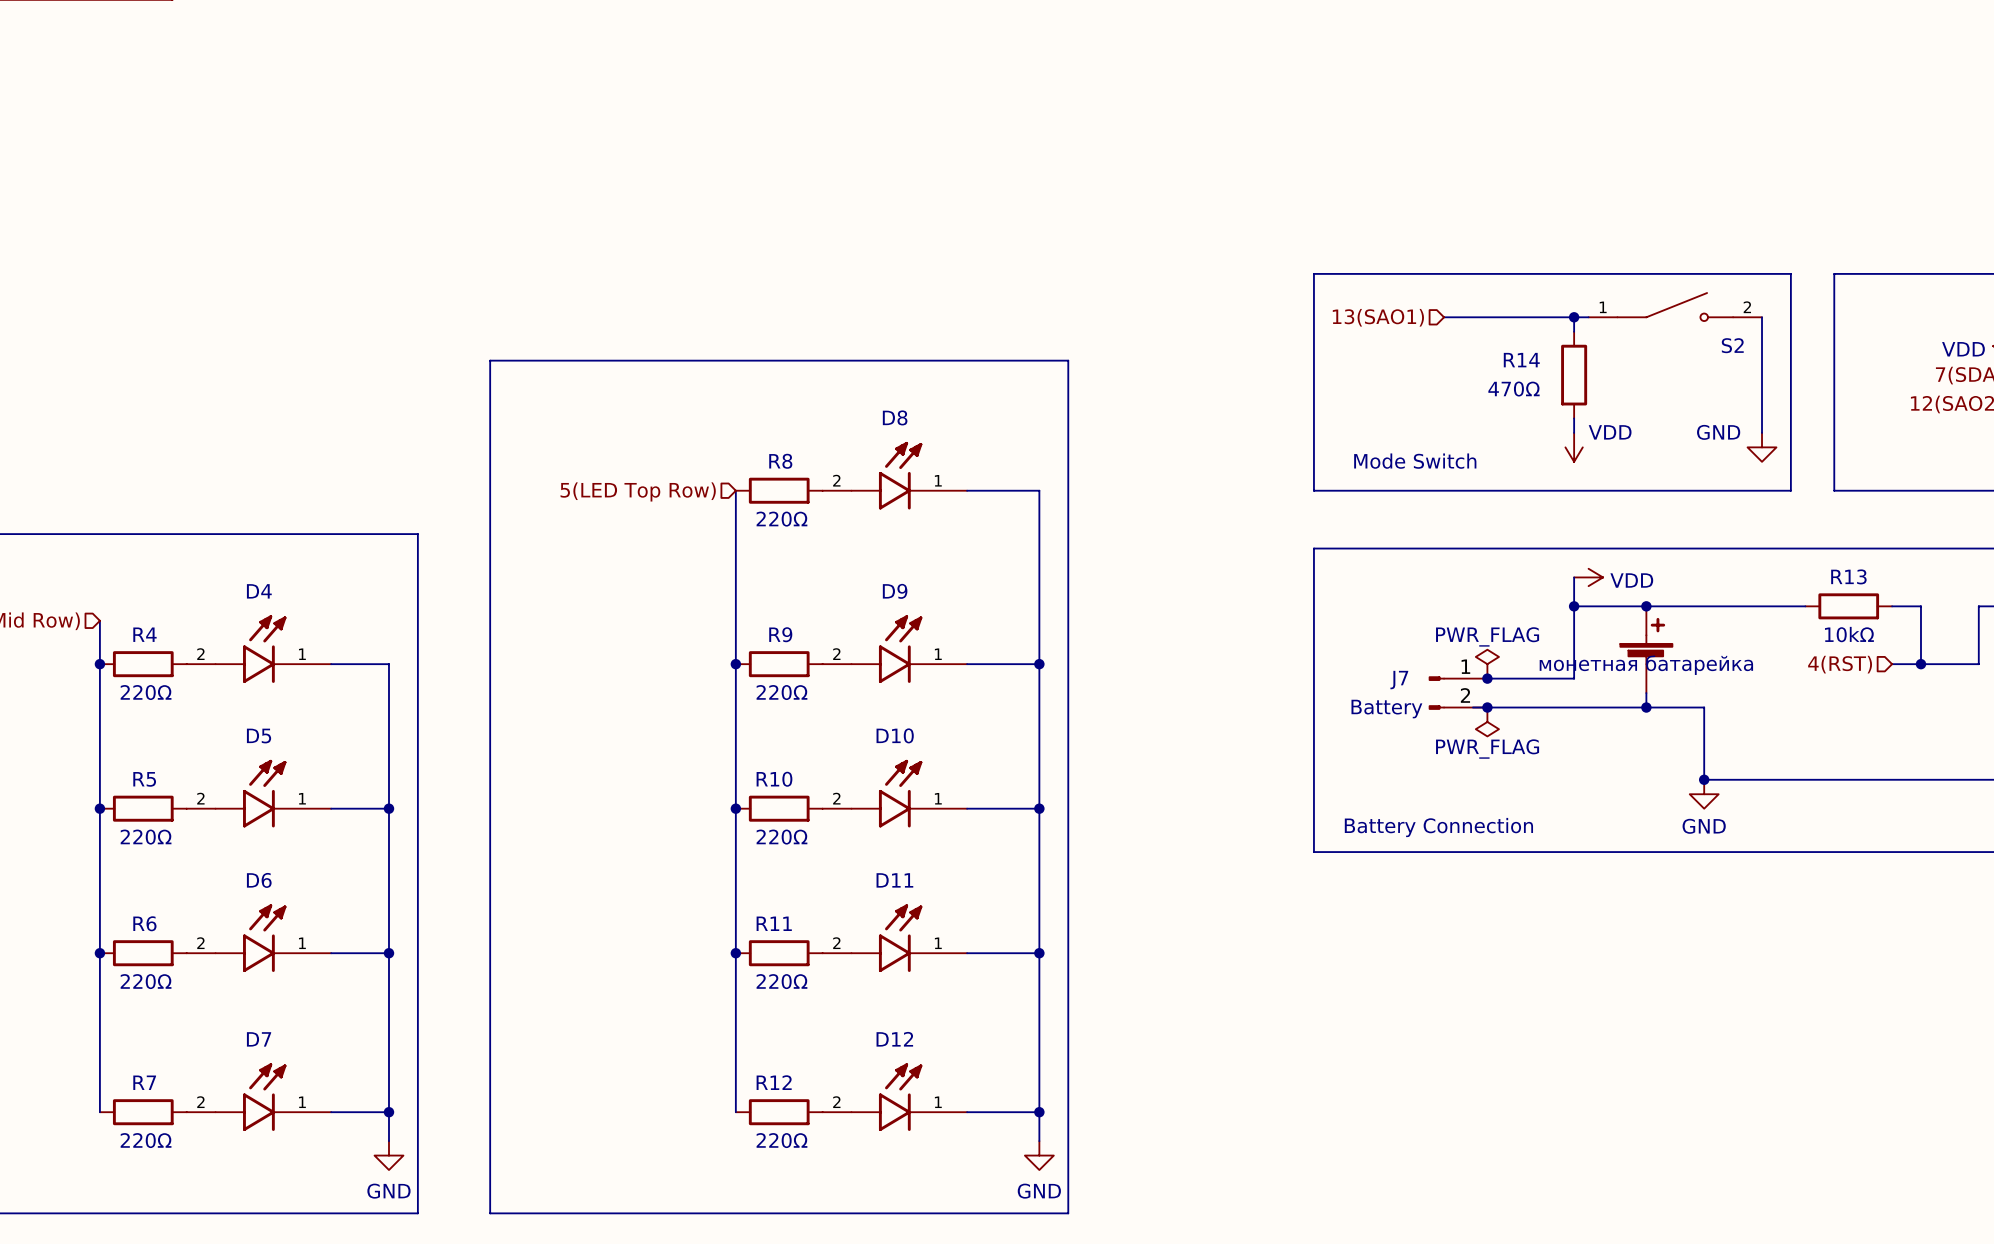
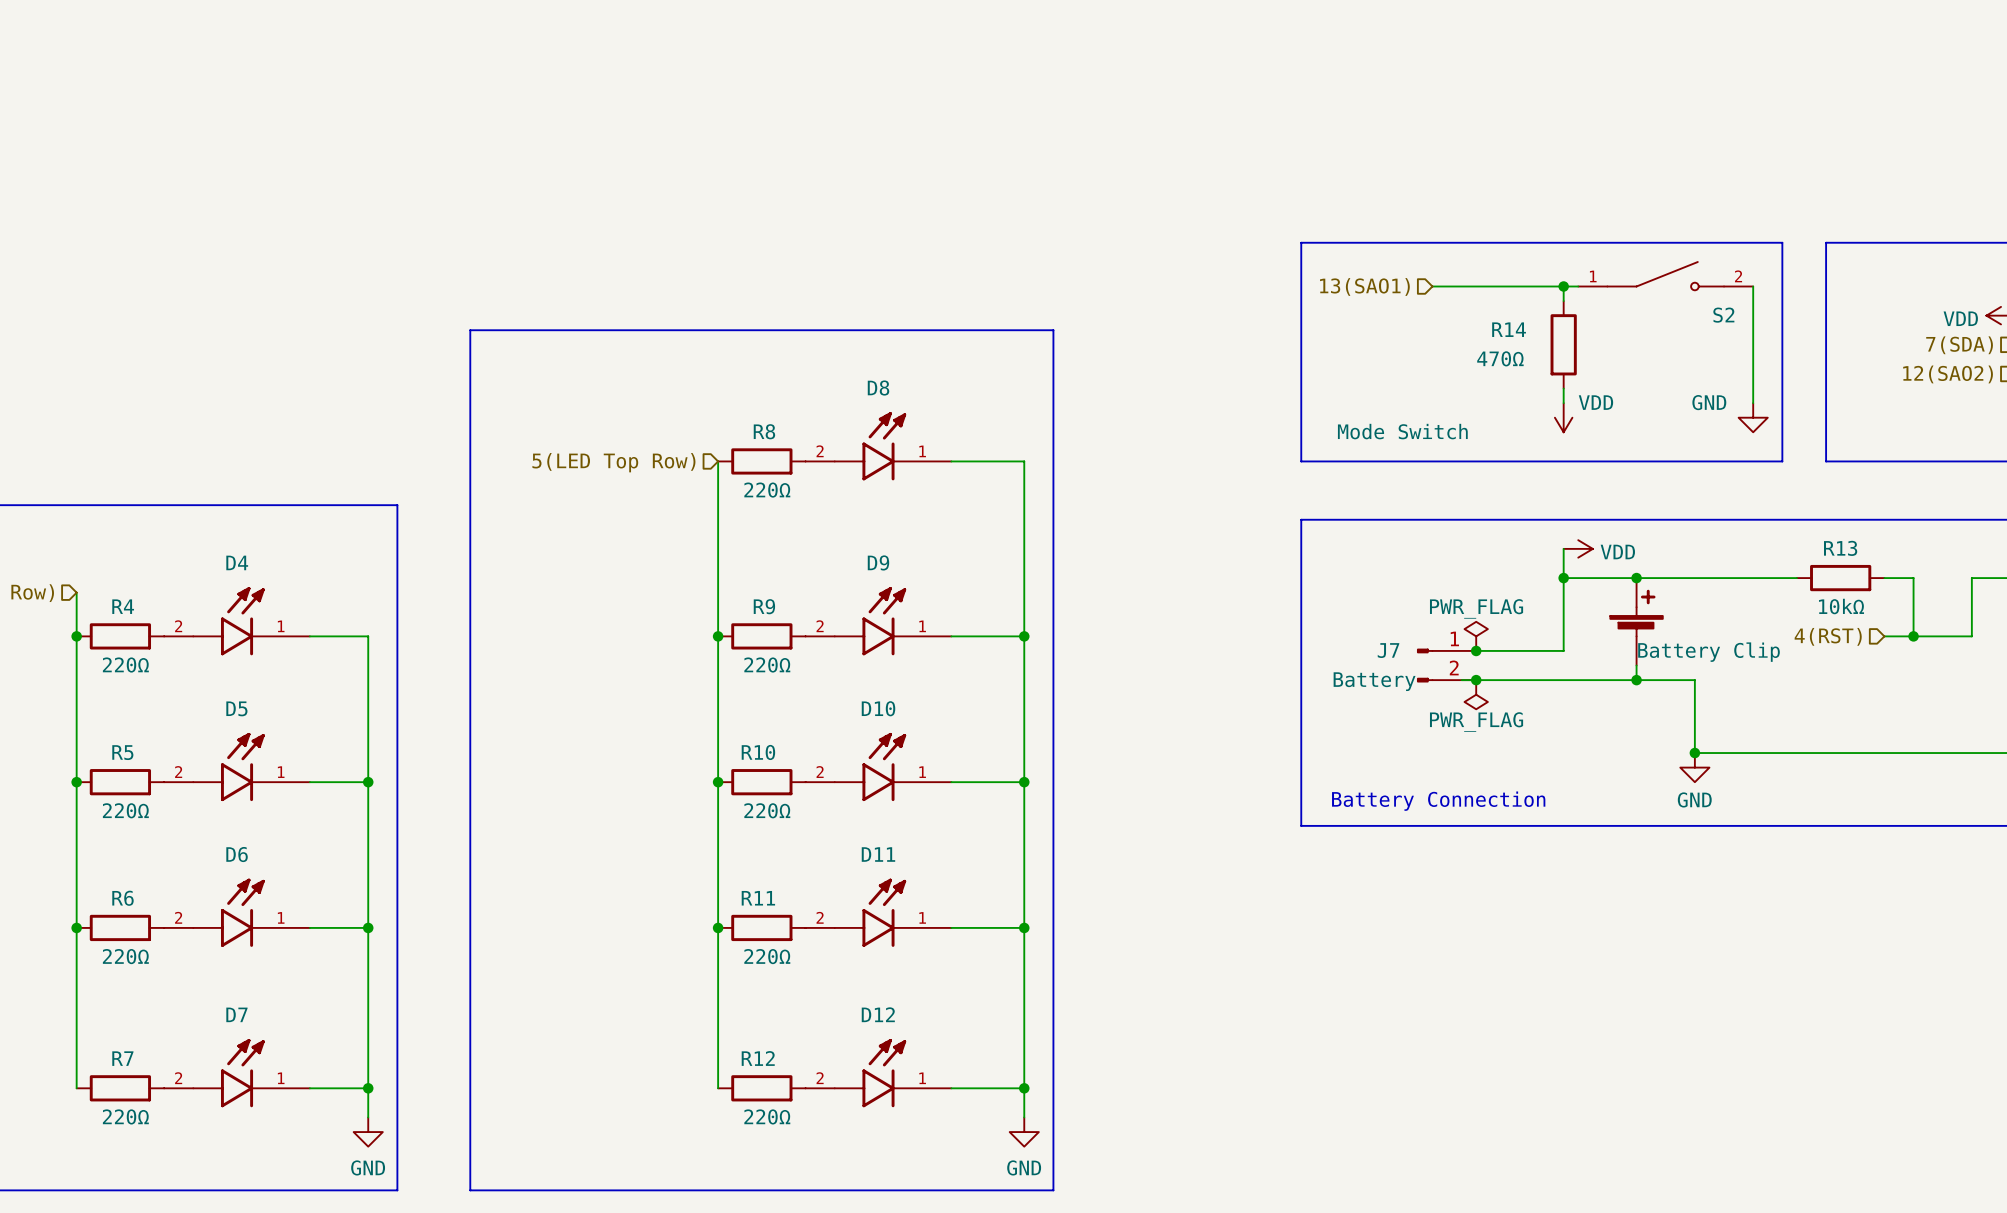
part text: монетная батарейка (1646, 665) -> none
part value: none -> Battery Clip (1709, 652)

